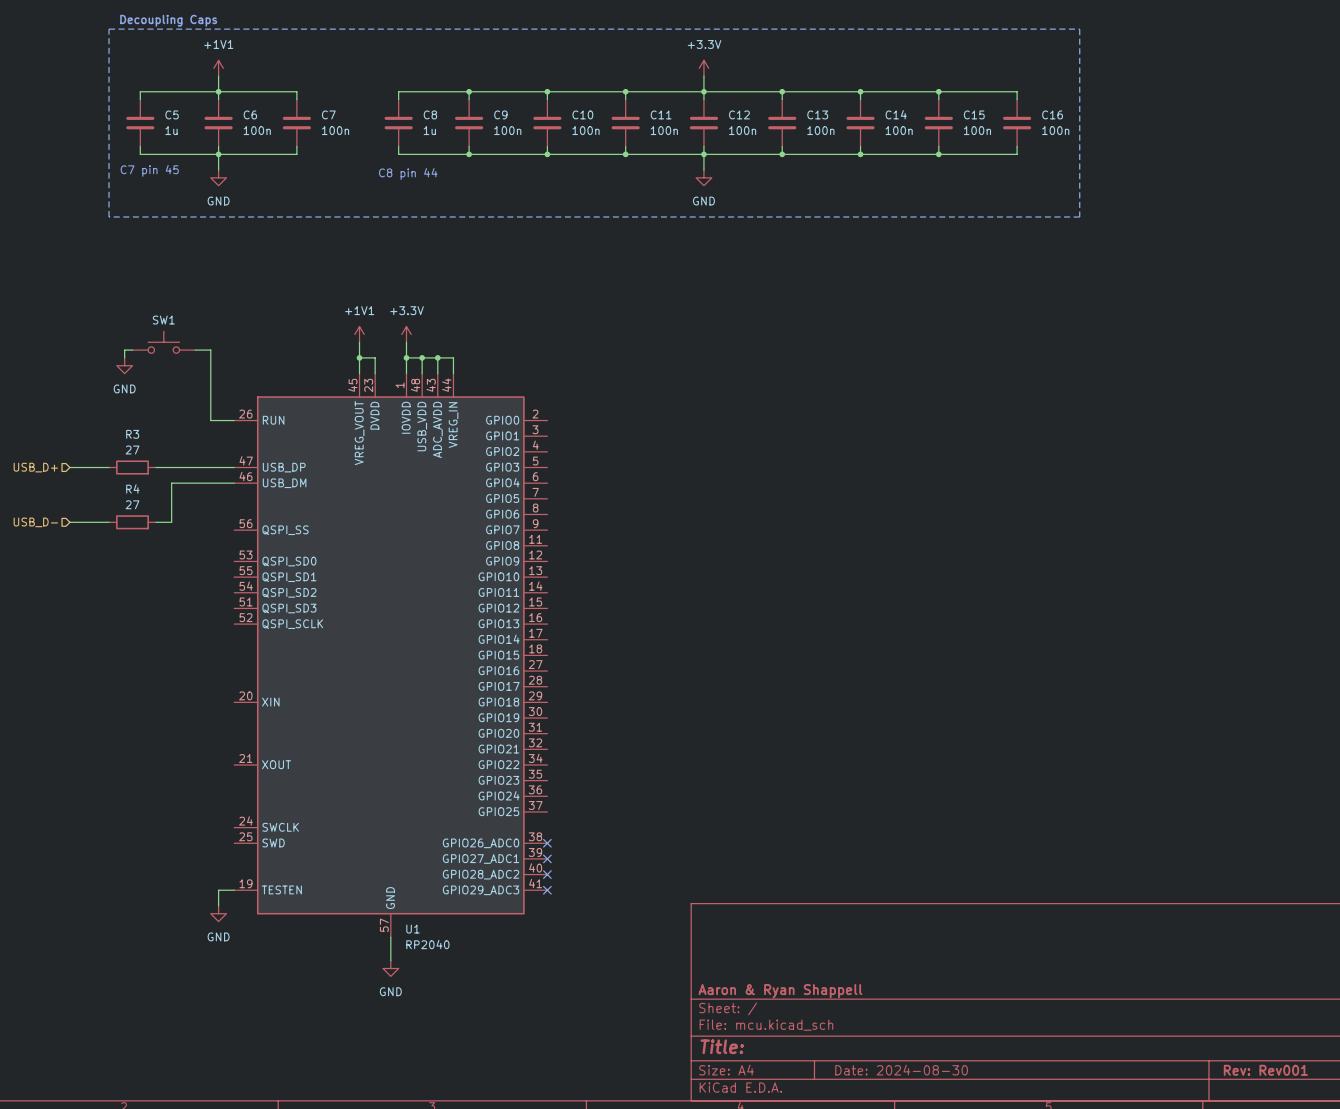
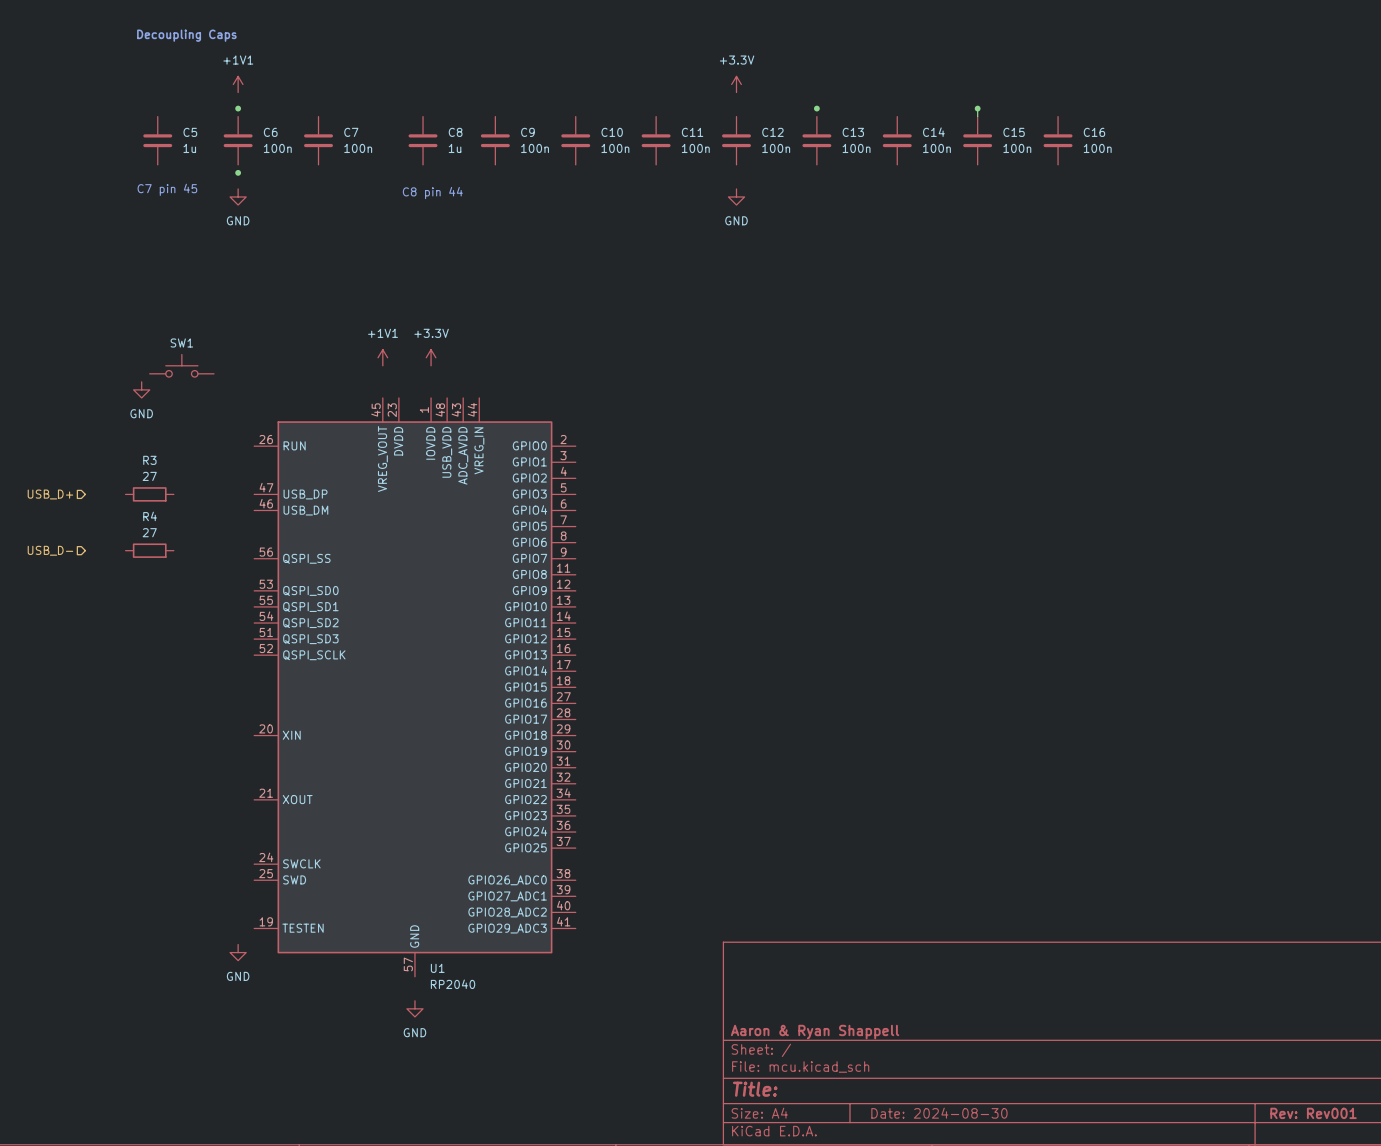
line: (109, 29) (1079, 29) (1079, 217) (109, 217) (109, 29) -> none
wire: (218, 76) (218, 99) -> none
wire: (703, 76) (703, 99) -> none
wire: (469, 91) (469, 99) -> none
junction: (469, 91) -> none
wire: (547, 91) (547, 99) -> none
junction: (547, 91) -> none
wire: (625, 91) (625, 99) -> none
junction: (625, 91) -> none
junction: (703, 91) -> none
wire: (782, 91) (782, 99) -> none
wire: (860, 91) (860, 99) -> none
junction: (860, 91) -> none
wire: (140, 99) (140, 91) (296, 91) (296, 99) -> none
wire: (398, 99) (398, 91) (1017, 91) (1017, 99) -> none
wire: (140, 146) (140, 154) (296, 154) (296, 146) -> none
wire: (218, 146) (218, 170) -> none
wire: (398, 146) (398, 154) (1017, 154) (1017, 146) -> none
wire: (469, 146) (469, 154) -> none
wire: (547, 146) (547, 154) -> none
wire: (625, 146) (625, 154) -> none
wire: (703, 146) (703, 170) -> none
wire: (782, 146) (782, 154) -> none
wire: (860, 146) (860, 154) -> none
wire: (938, 146) (938, 154) -> none
junction: (469, 154) -> none
junction: (547, 154) -> none
junction: (625, 154) -> none
junction: (703, 154) -> none
junction: (782, 154) -> none
junction: (860, 154) -> none
junction: (938, 154) -> none
wire: (359, 342) (359, 373) -> none
wire: (406, 342) (406, 373) -> none
wire: (132, 350) (124, 350) (124, 357) -> none
wire: (195, 350) (210, 350) (210, 420) (234, 420) -> none
wire: (359, 357) (375, 357) (375, 373) -> none
junction: (359, 357) -> none
wire: (406, 357) (453, 357) (453, 373) -> none
junction: (406, 357) -> none
wire: (422, 357) (422, 373) -> none
junction: (422, 357) -> none
wire: (437, 357) (437, 373) -> none
junction: (437, 357) -> none
wire: (69, 467) (109, 467) -> none
wire: (155, 467) (234, 467) -> none
wire: (234, 483) (171, 483) (171, 522) (155, 522) -> none
wire: (69, 522) (109, 522) -> none
no-connect mark: (547, 843) -> none
no-connect mark: (547, 858) -> none
no-connect mark: (547, 874) -> none
wire: (234, 890) (218, 890) (218, 905) -> none
no-connect mark: (547, 890) -> none
wire: (390, 937) (390, 960) -> none

